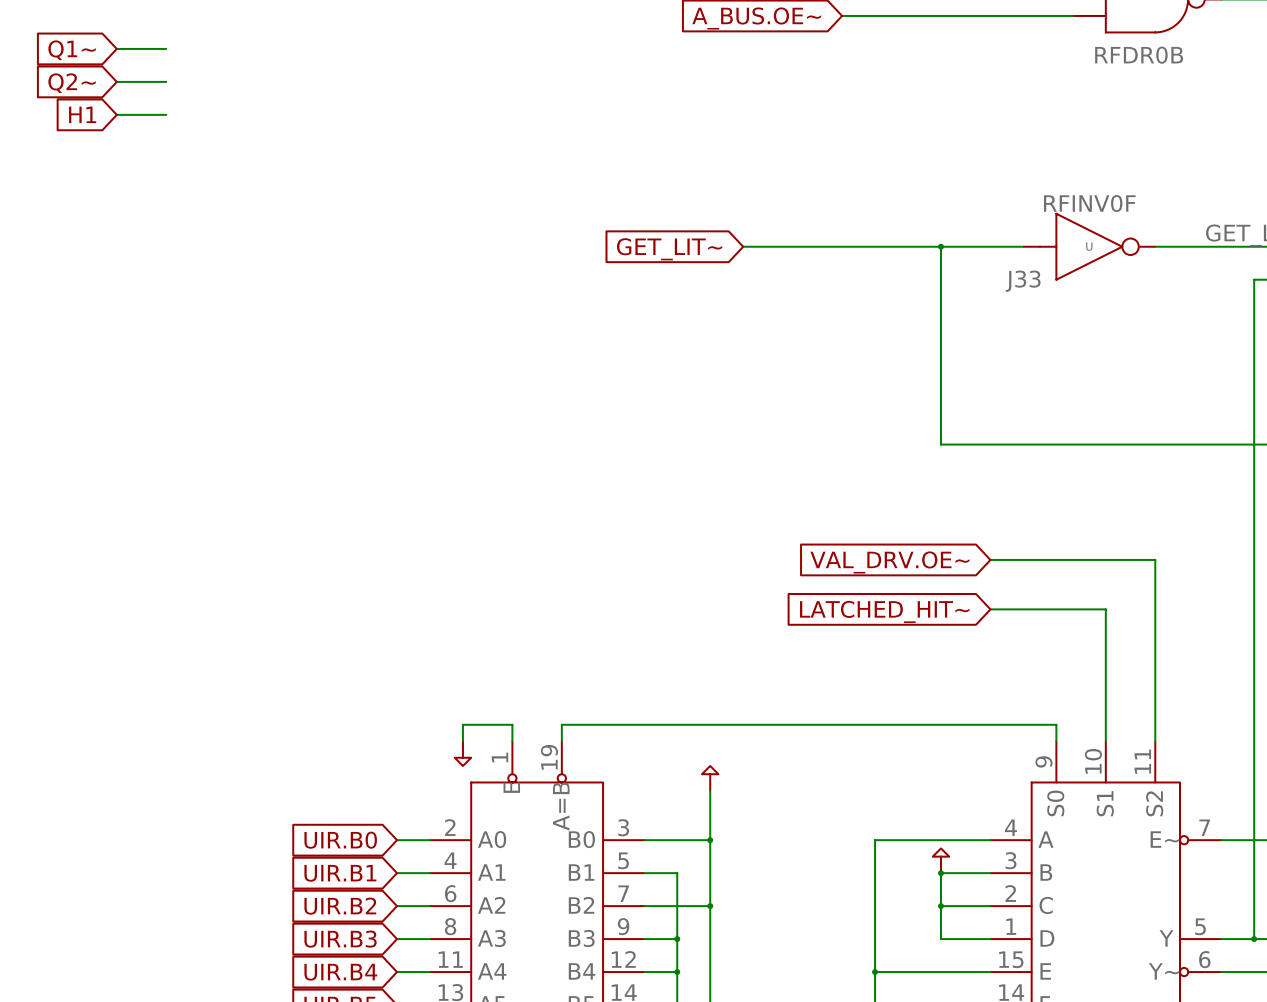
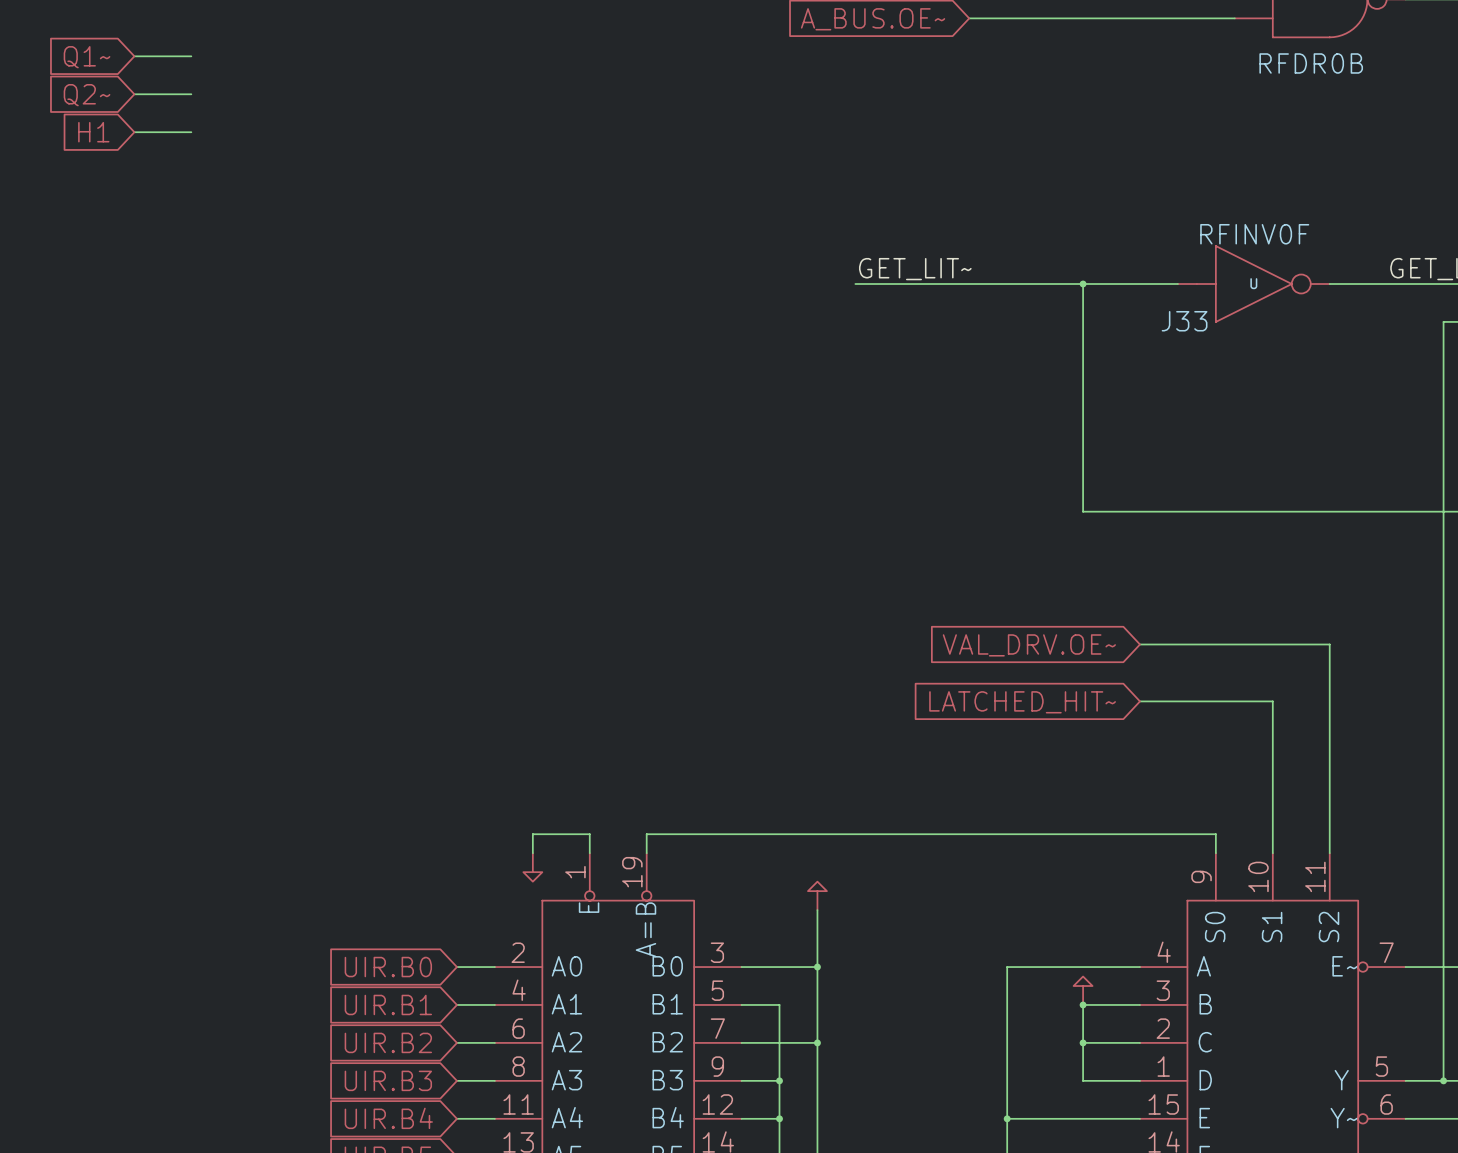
label: none -> GET_LIT~ (915, 269)
global label: GET_LIT~ (669, 249) -> none

